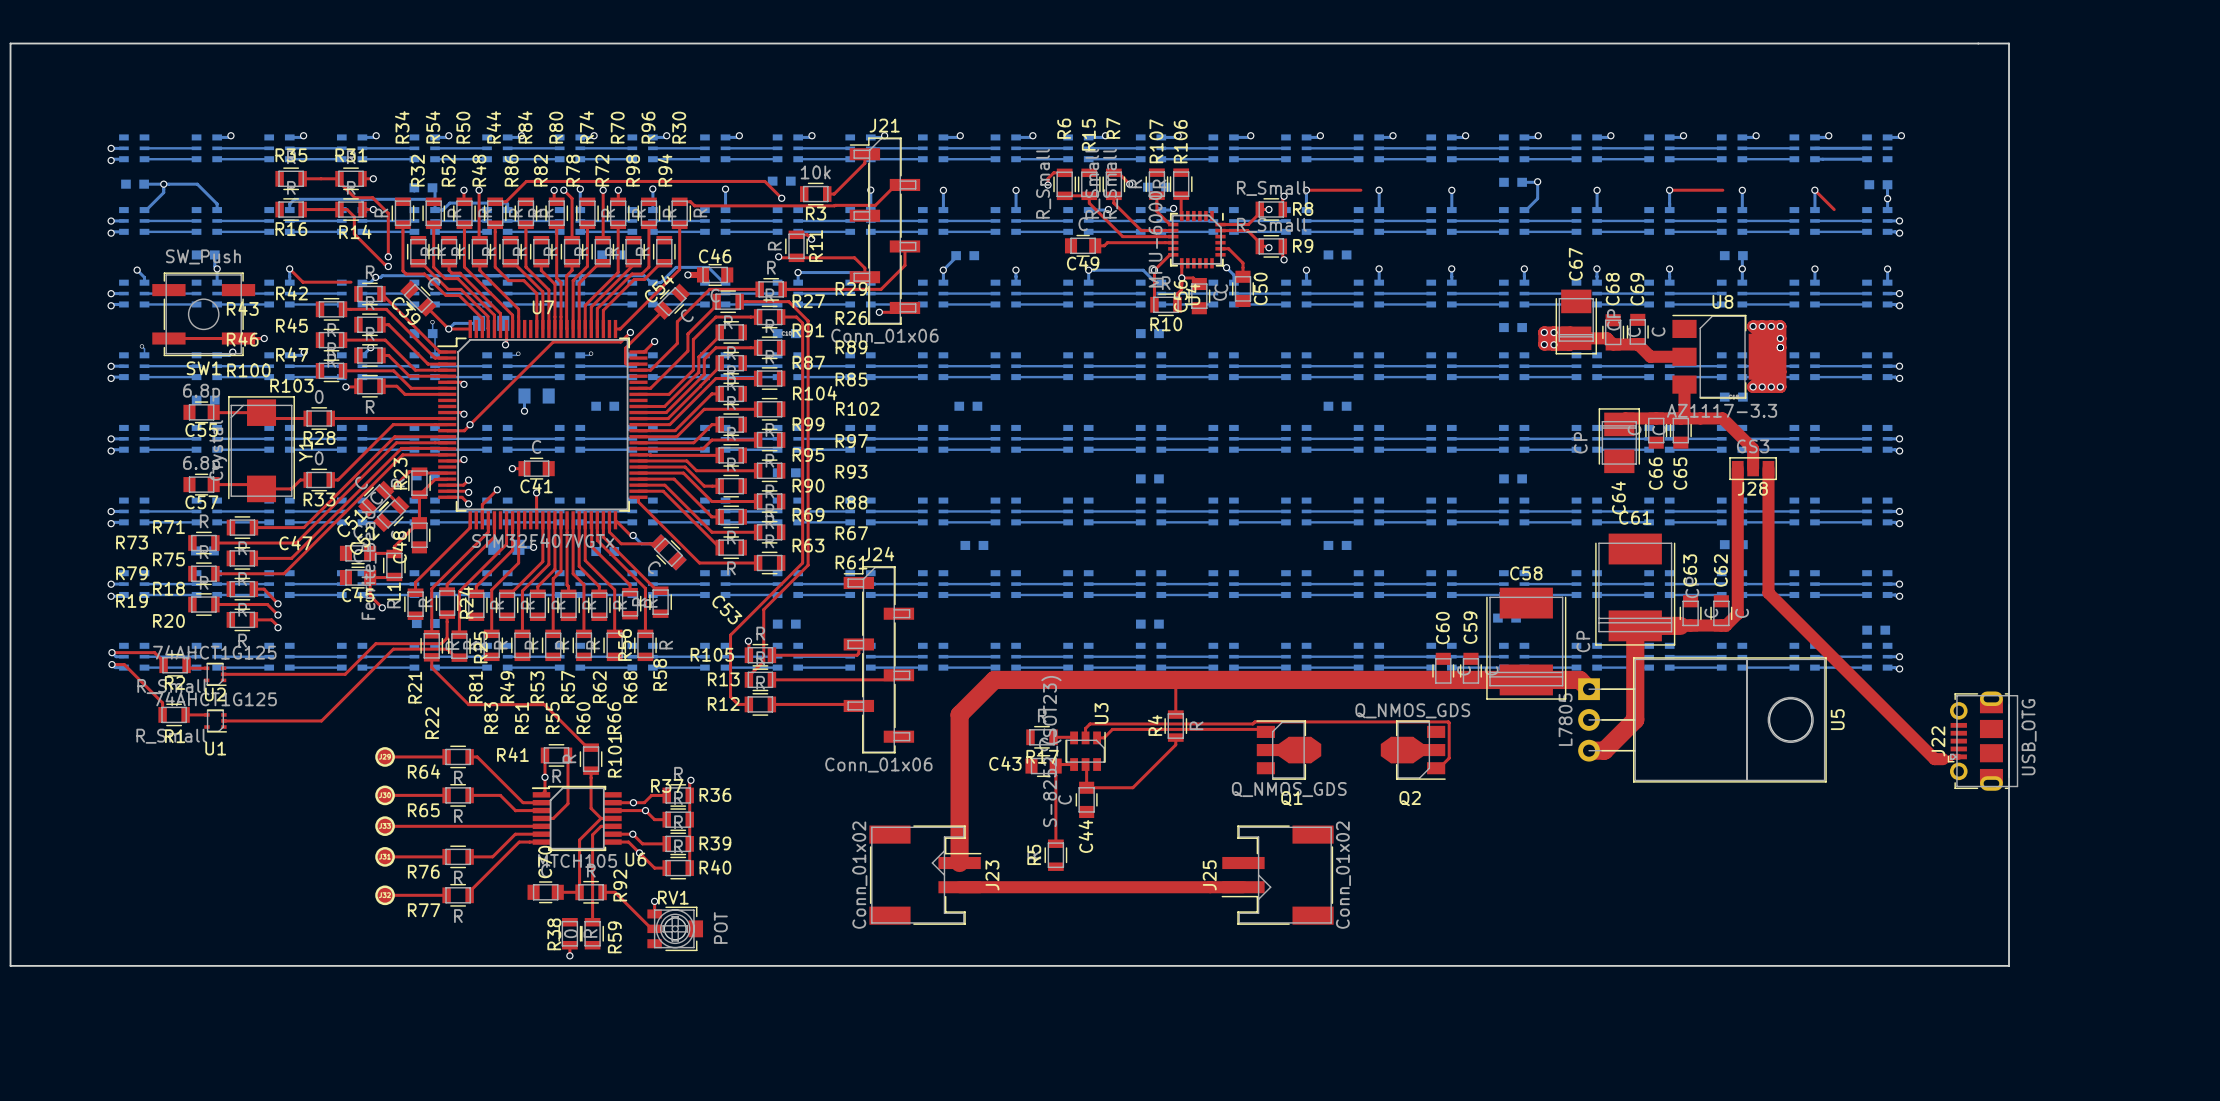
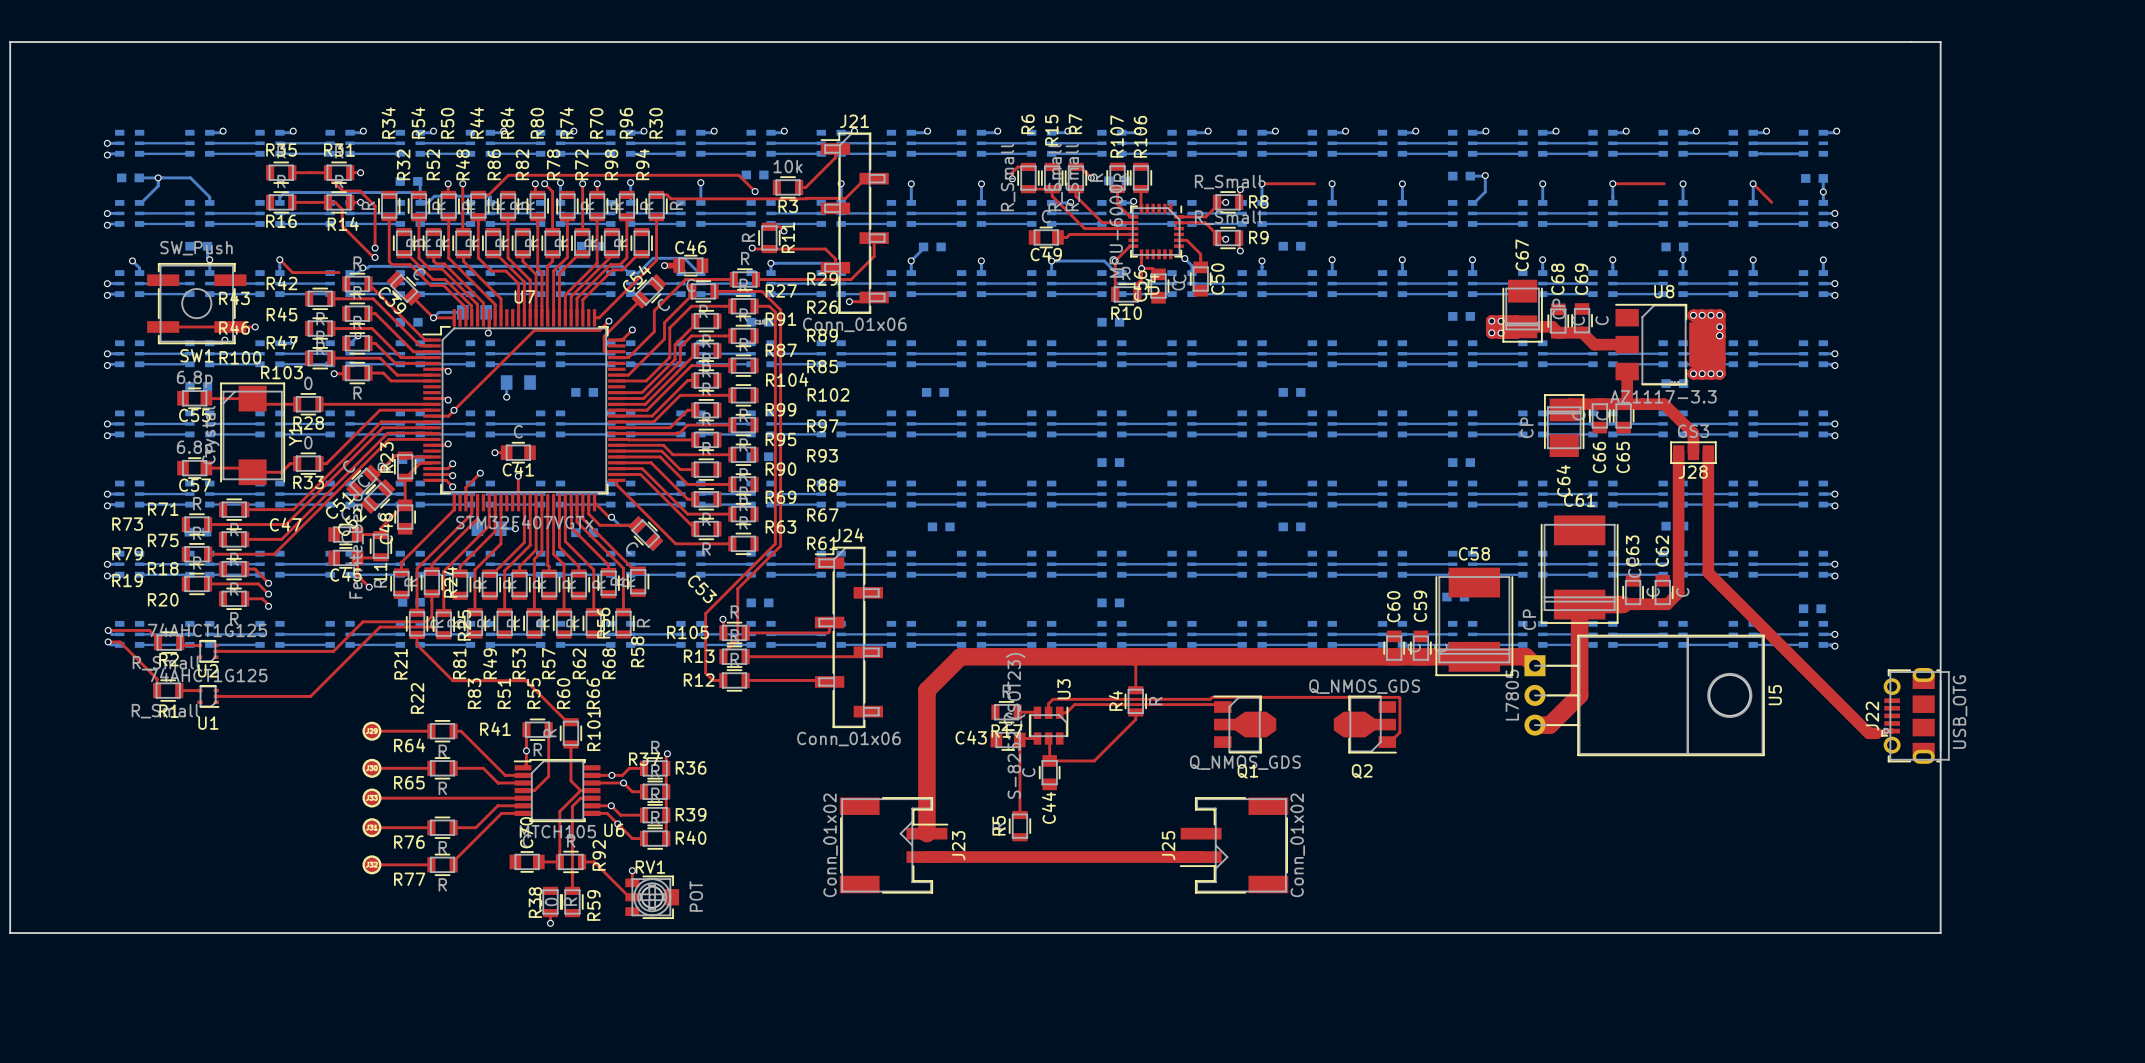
bottom track: (432, 322) (435, 355) -> none
via: (432, 322) -> none
bottom track: (141, 346) (144, 348) (144, 355) -> none
via: (141, 346) -> none
bottom track: (518, 353) (507, 355) -> none
via: (518, 353) -> none
bottom track: (591, 353) (580, 355) -> none
via: (591, 353) -> none

